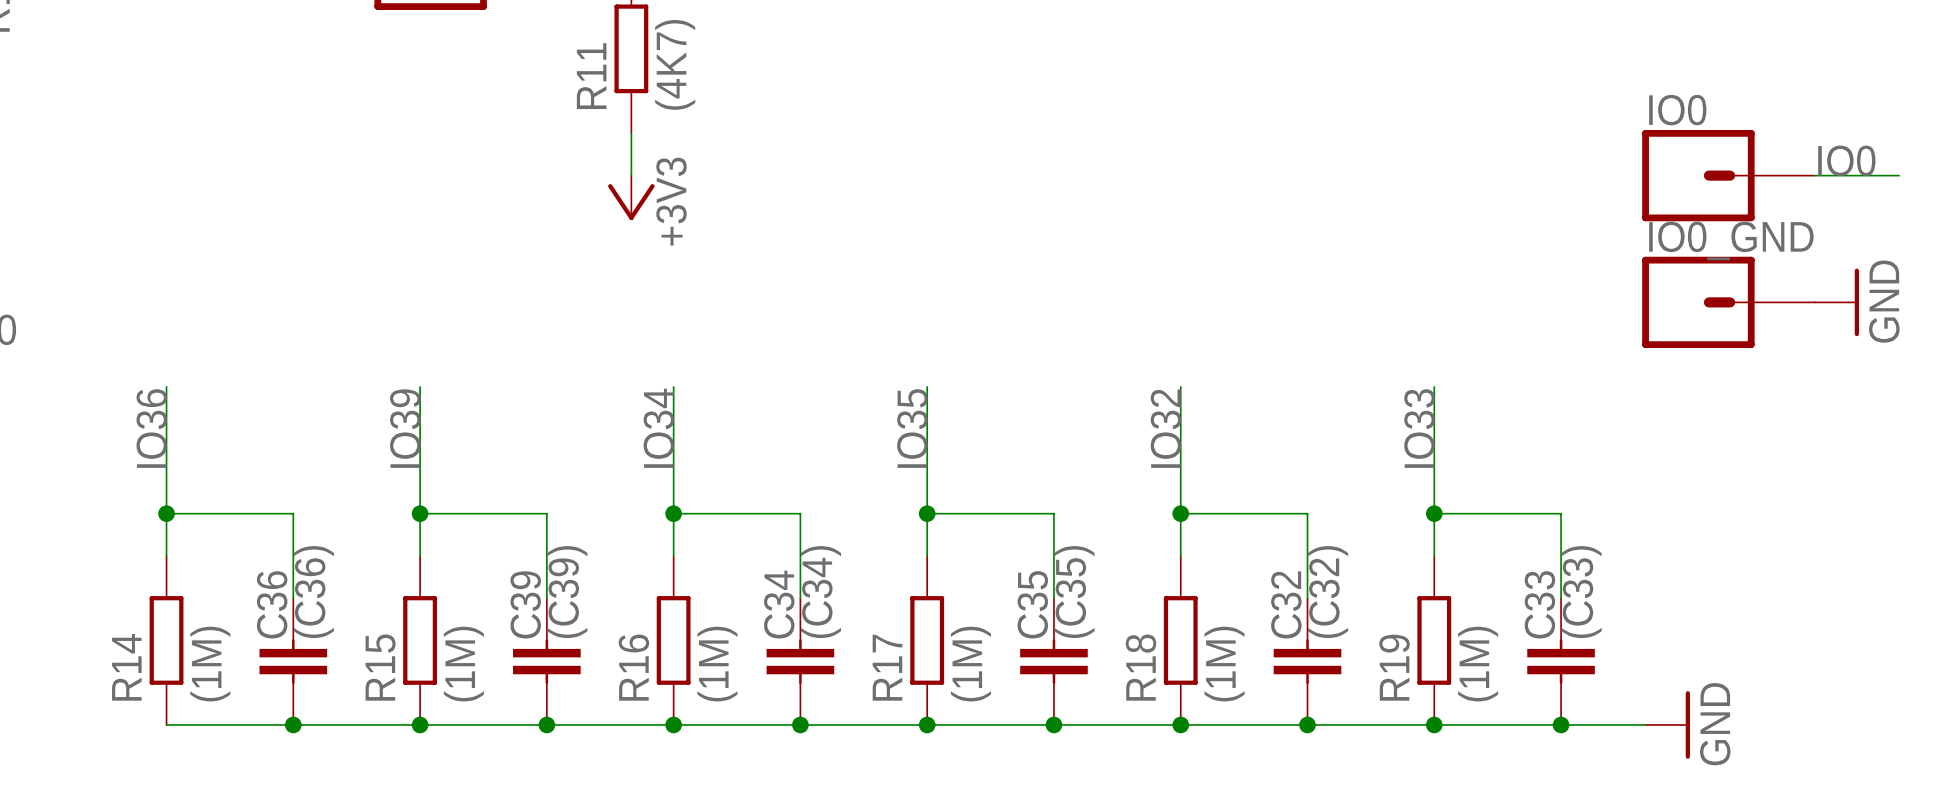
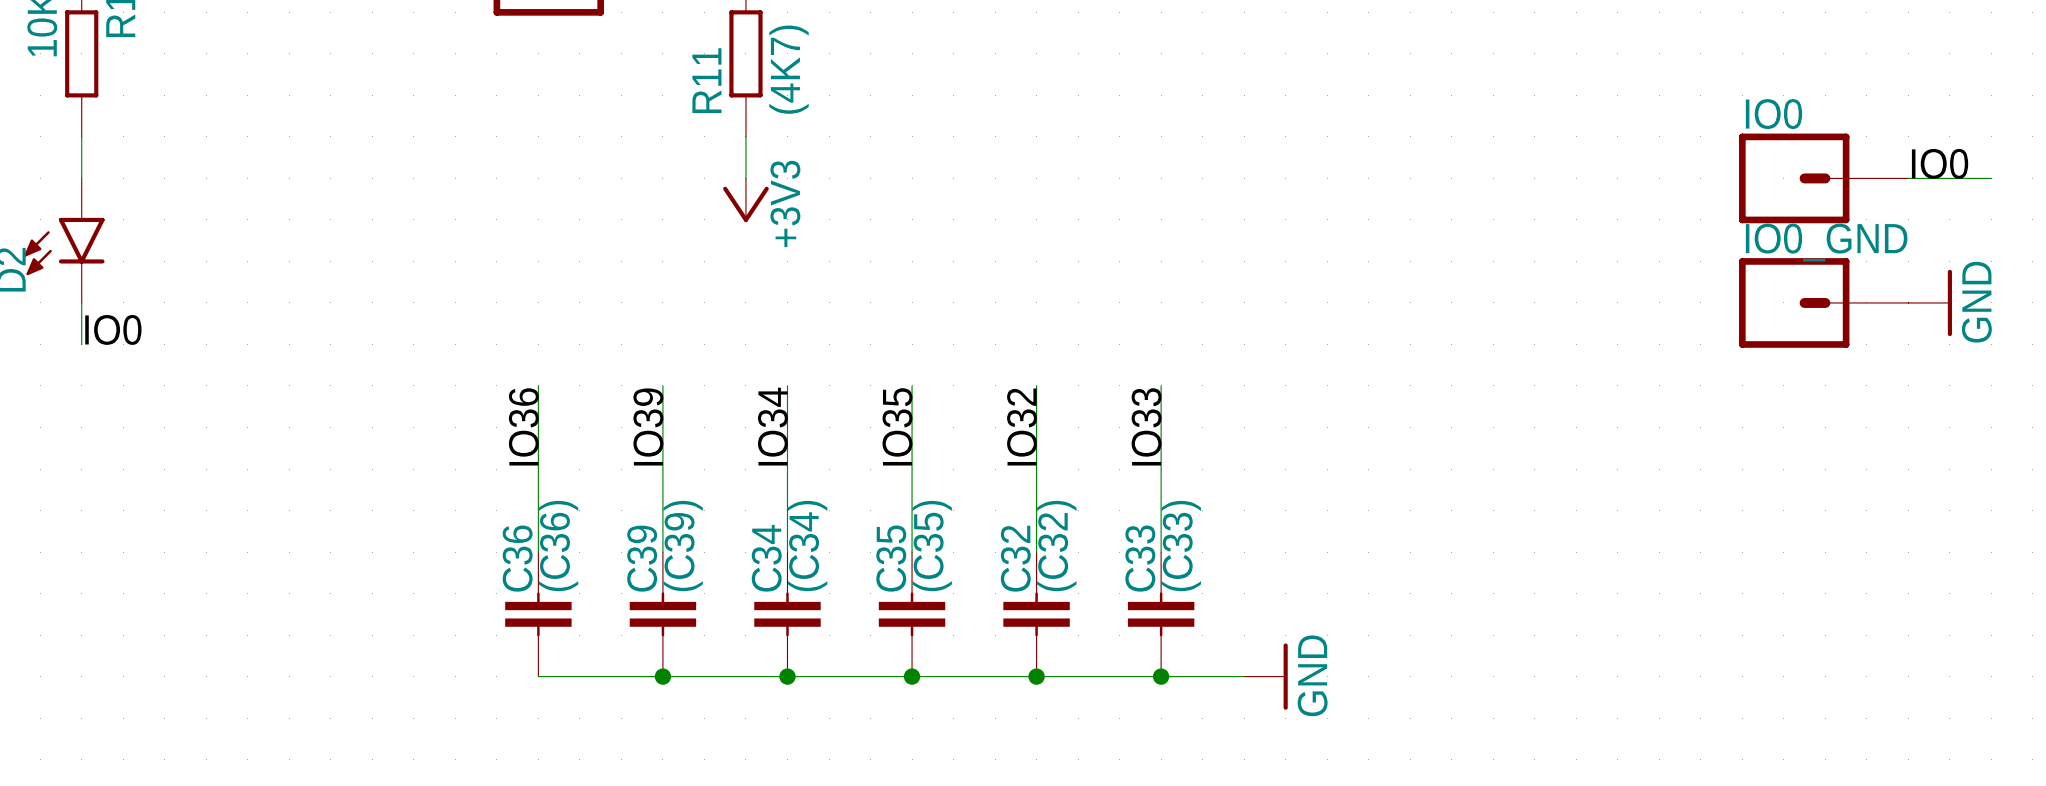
wire: (166, 386) (166, 555) -> none
wire: (1180, 386) (1180, 555) -> none
wire: (1434, 386) (1434, 555) -> none
label: IO36 (151, 428) -> none
label: IO39 (405, 428) -> IO36 (523, 426)
label: none -> IO39 (648, 426)
label: none -> IO35 (897, 426)
label: IO35 (912, 428) -> IO32 (1022, 427)
label: IO32 (1165, 428) -> none
label position: IO33 (1419, 428) -> IO33 (1146, 426)
wire: (166, 513) (293, 513) (293, 598) -> none
junction: (166, 513) -> none
wire: (420, 513) (546, 513) -> (662, 385) (662, 510)
junction: (420, 513) -> none
wire: (673, 513) (800, 513) -> (912, 385) (912, 510)
junction: (673, 513) -> none
wire: (927, 513) (1053, 513) -> (1161, 385) (1161, 510)
junction: (927, 513) -> none
wire: (1180, 513) (1307, 513) (1307, 598) -> none
junction: (1180, 513) -> none
wire: (1434, 513) (1561, 513) (1561, 598) -> none
junction: (1434, 513) -> none
R14: (1M) (166, 640) -> none
R15: (1M) (420, 640) -> none
R16: (1M) (673, 640) -> none
R17: (1M) (927, 640) -> none
R18: (1M) (1180, 640) -> none
R19: (1M) (1434, 640) -> none
C36 position: (293, 661) -> (538, 614)
C39 position: (546, 661) -> (662, 614)
C34 position: (800, 661) -> (787, 614)
C35 position: (1053, 661) -> (912, 614)
C32 position: (1307, 661) -> (1036, 614)
C33 position: (1561, 661) -> (1161, 614)
wire: none -> (538, 676) (1244, 676)
power symbol: none -> GND (1265, 676)
wire: (166, 724) (1645, 724) -> none
junction: (293, 724) -> none
junction: (420, 724) -> none
junction position: (546, 724) -> (662, 676)
junction position: (673, 724) -> (787, 676)
junction position: (800, 724) -> (912, 676)
junction position: (927, 724) -> (1036, 676)
junction position: (1053, 724) -> (1161, 676)
junction: (1180, 724) -> none
junction: (1307, 724) -> none
junction: (1434, 724) -> none
junction: (1561, 724) -> none
power symbol: GND (1667, 724) -> none

